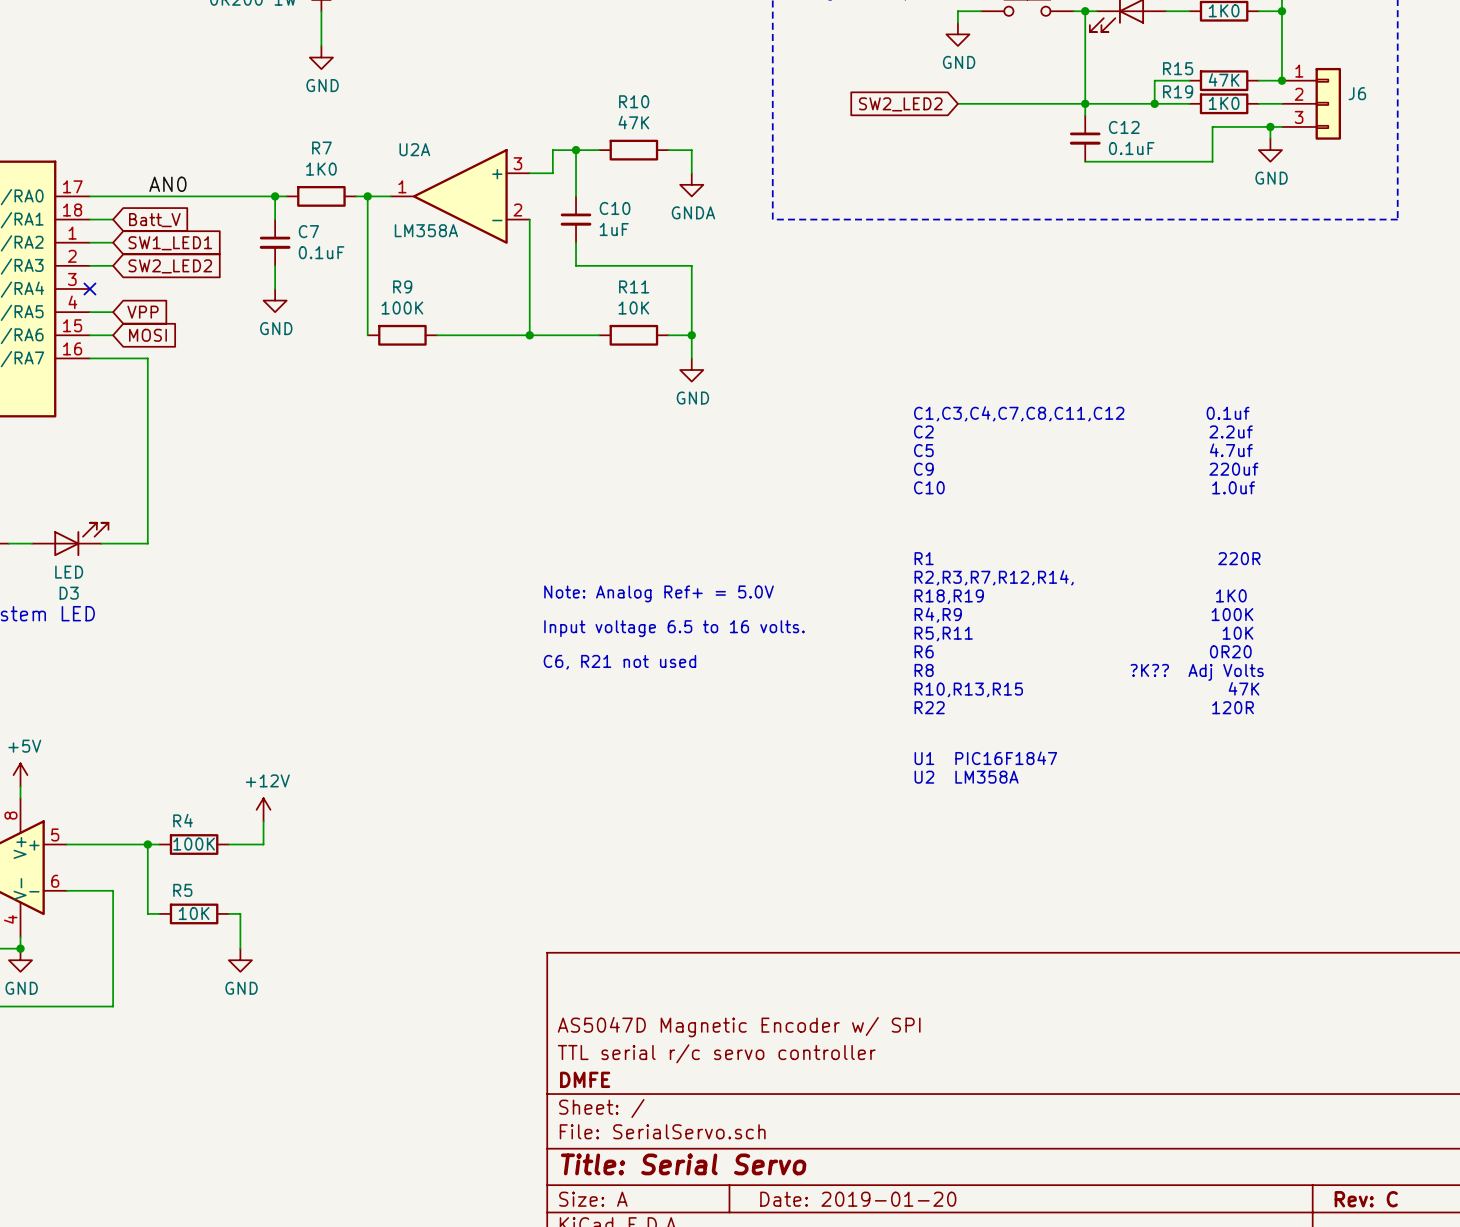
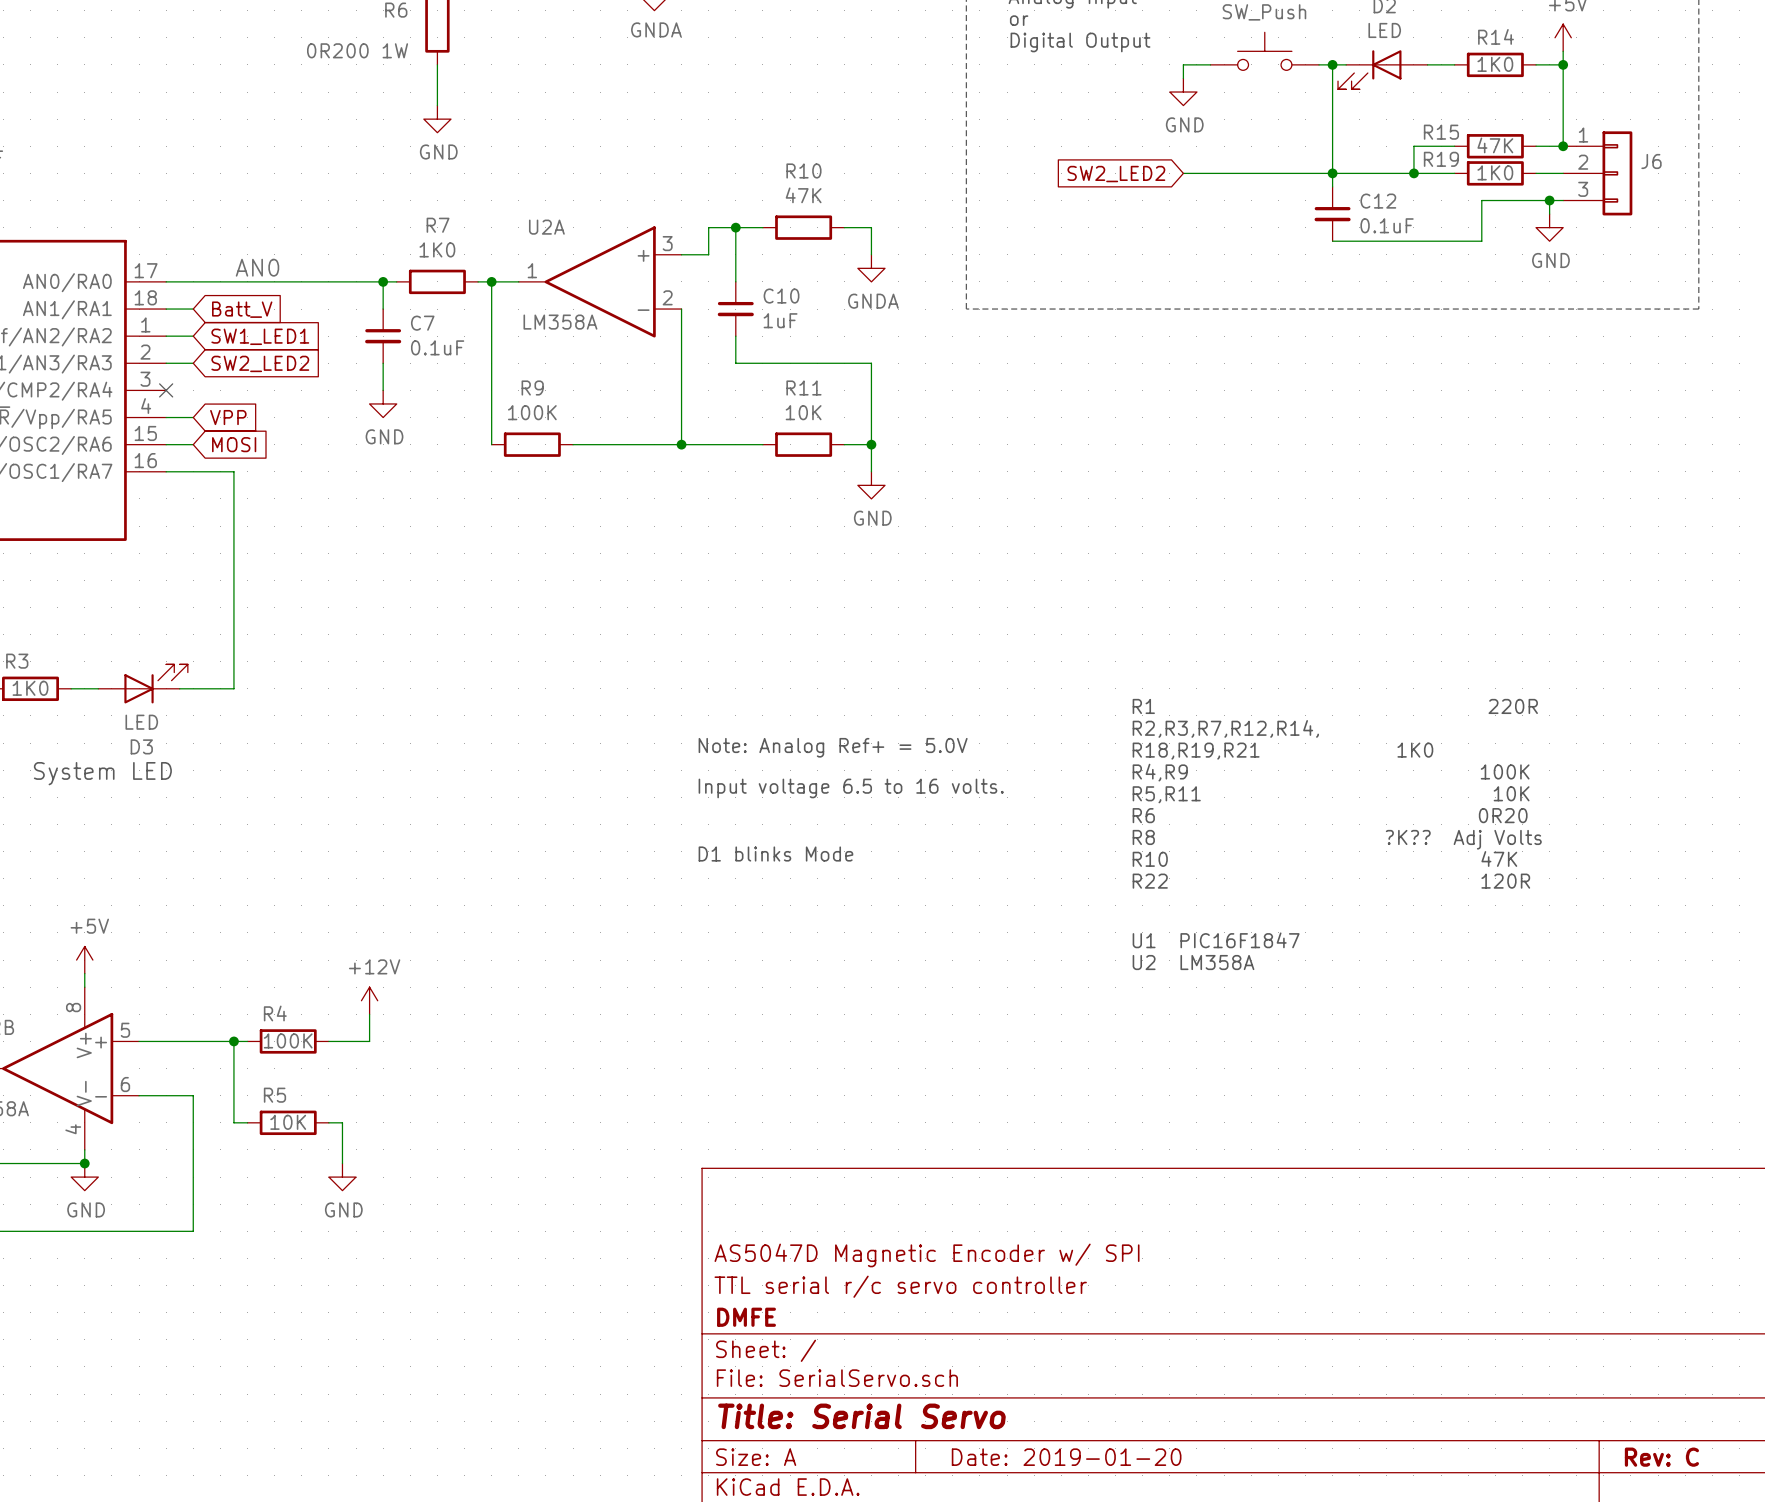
text: C1,C3,C4,C7,C8,C11,C12 0.1uf (1081, 413) -> none
text: C2 2.2uf (1083, 431) -> none
text: C5 4.7uf (1083, 450) -> none
text: C9 220uf (1086, 469) -> none
text: C10 1.0uf (1084, 487) -> none
text: R18,R19 1K0 (1080, 596) -> R18,R19,R21 1K0 (1282, 751)
text: C6, R21 not used (619, 662) -> none
text: none -> D1 blinks Mode (775, 854)
text: R10,R13,R15 47K (1086, 689) -> R10 47K (1324, 858)

